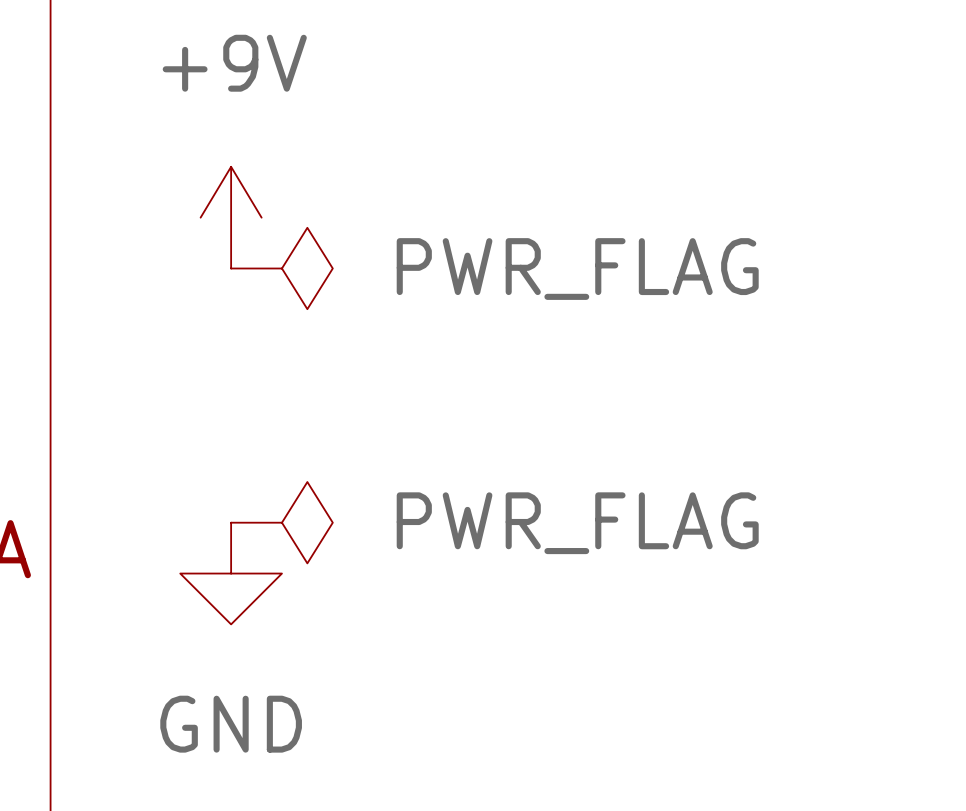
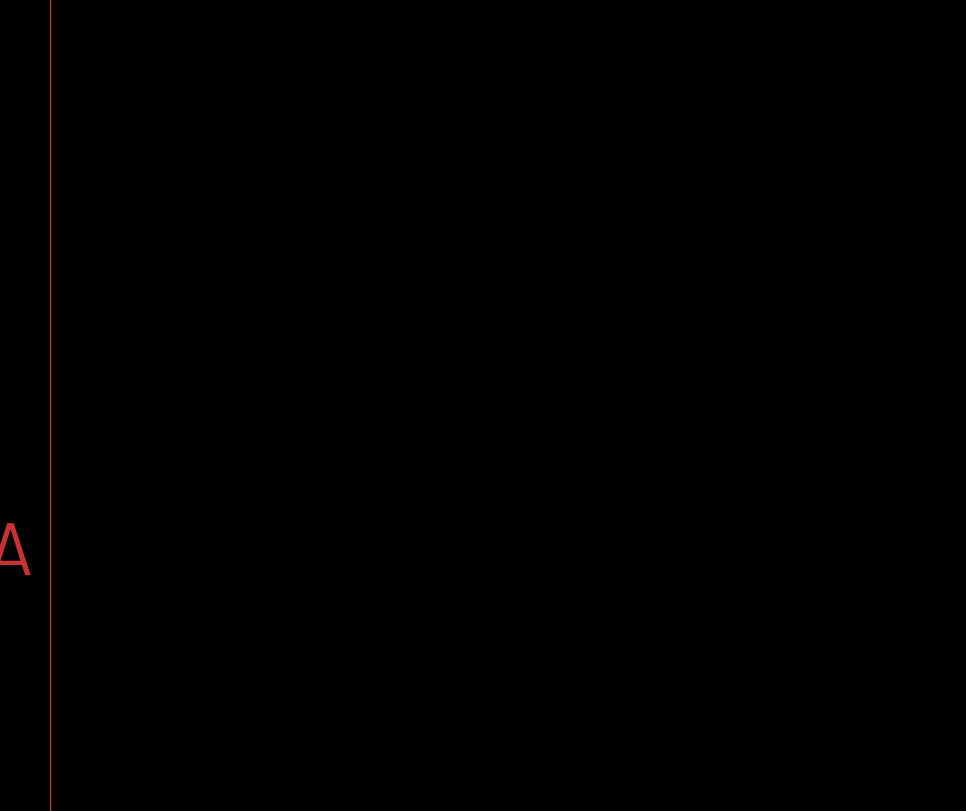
power symbol: +9V (231, 217) -> none
power symbol: PWR_FLAG (281, 268) -> none
power symbol: PWR_FLAG (281, 522) -> none
power symbol: GND (231, 573) -> none

